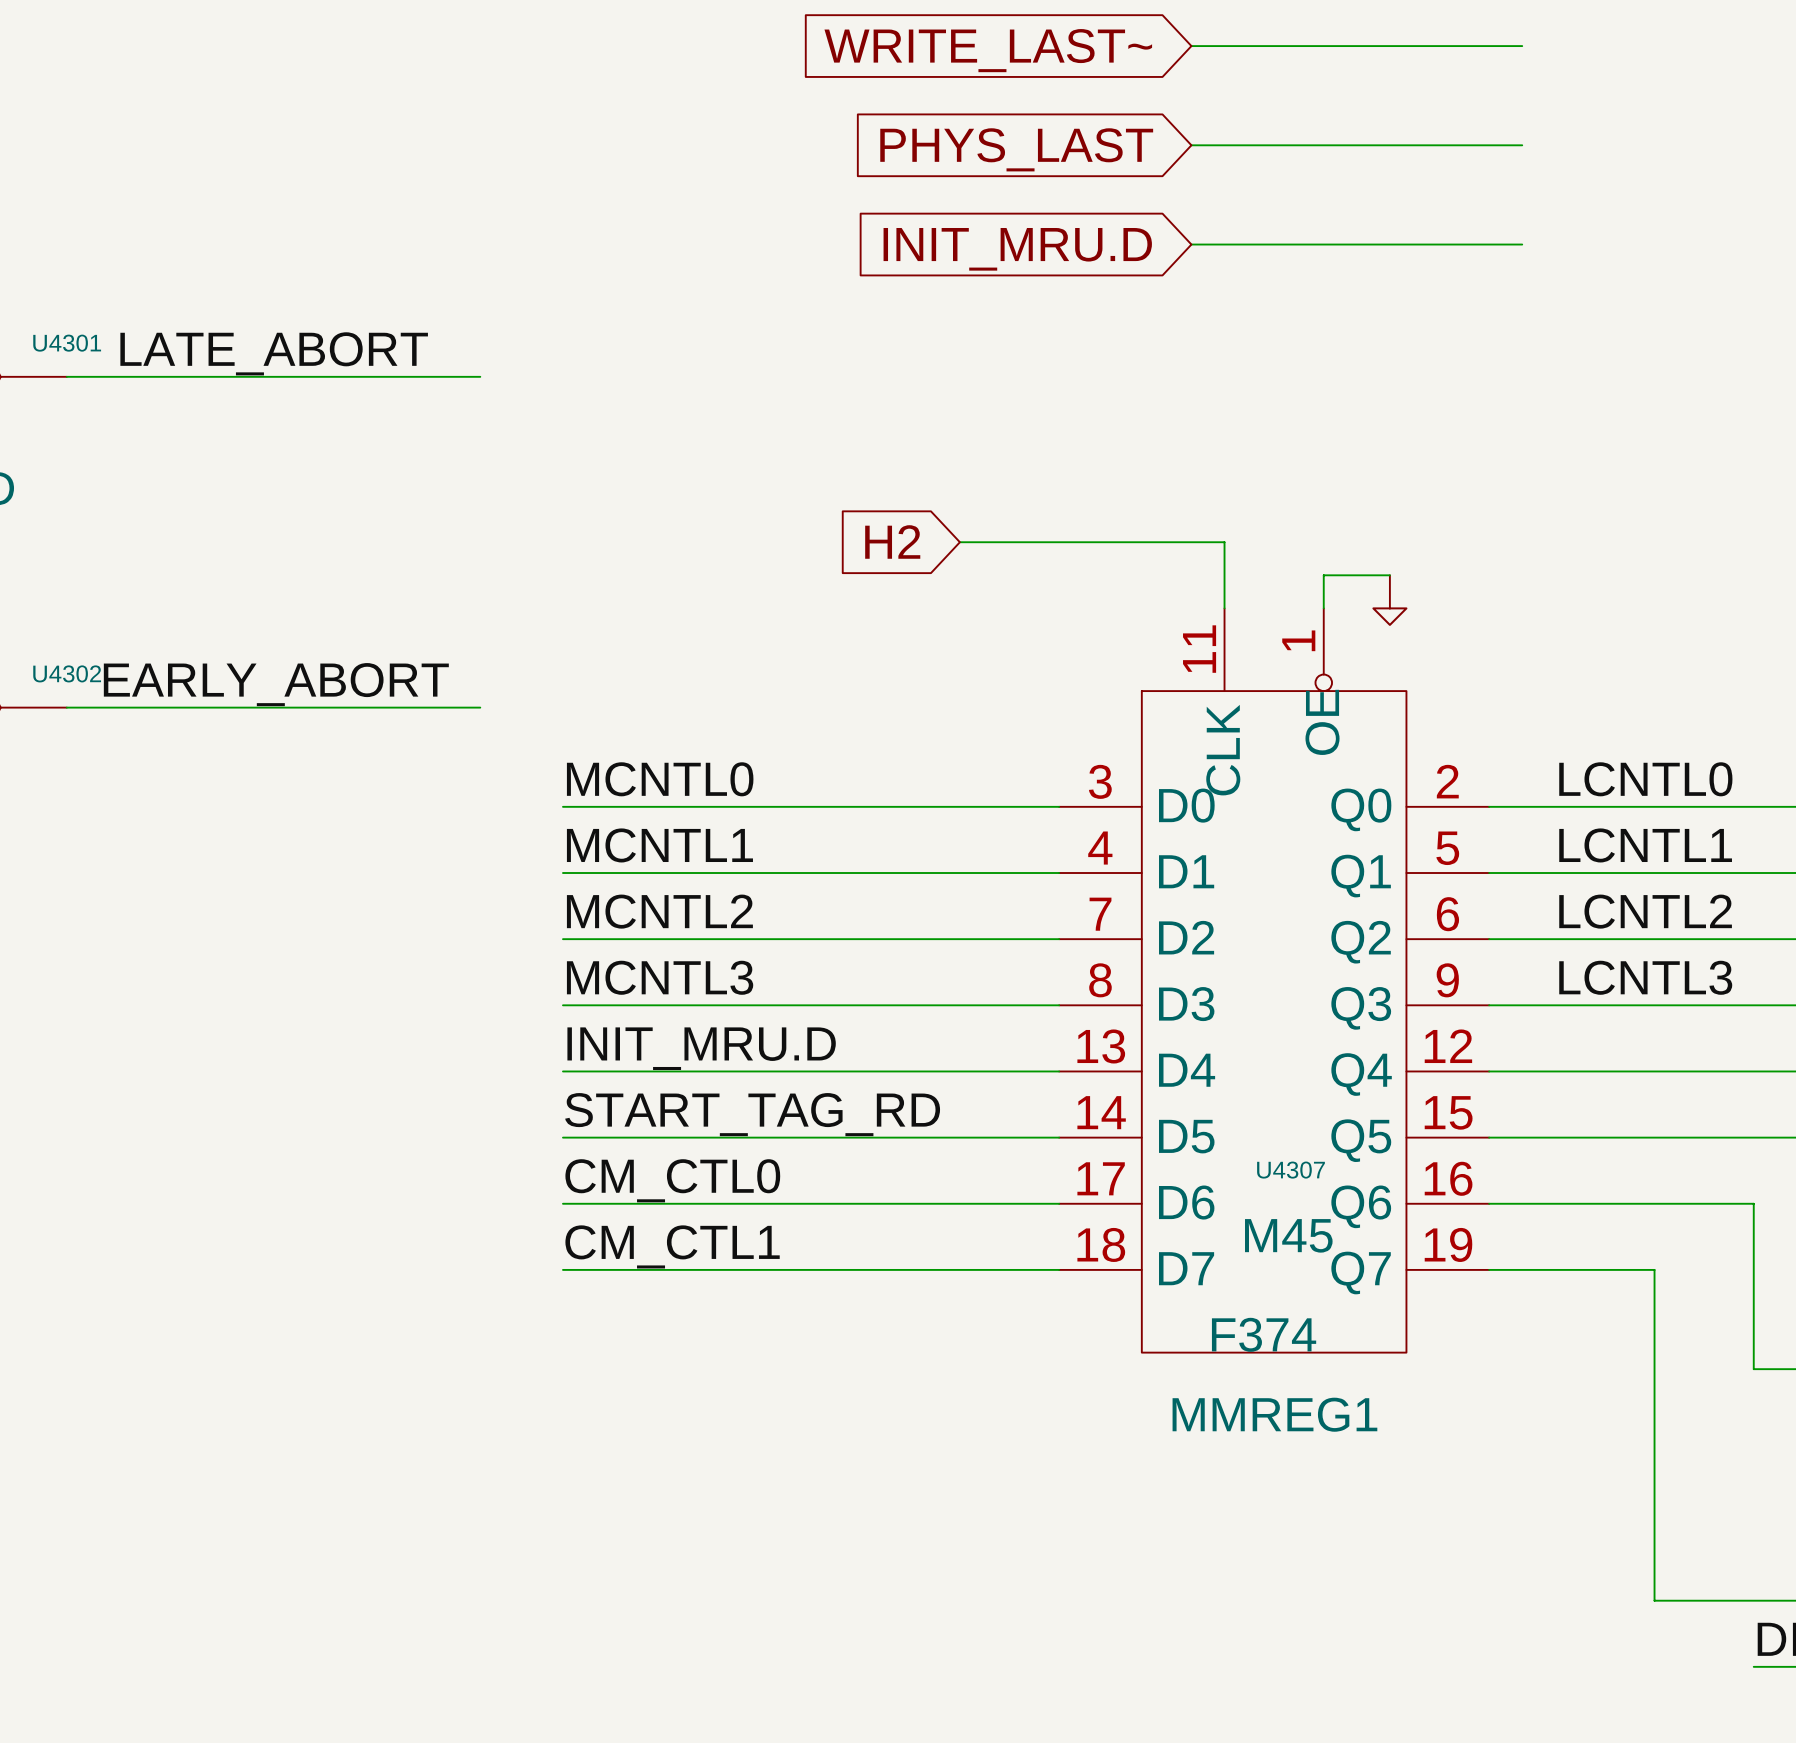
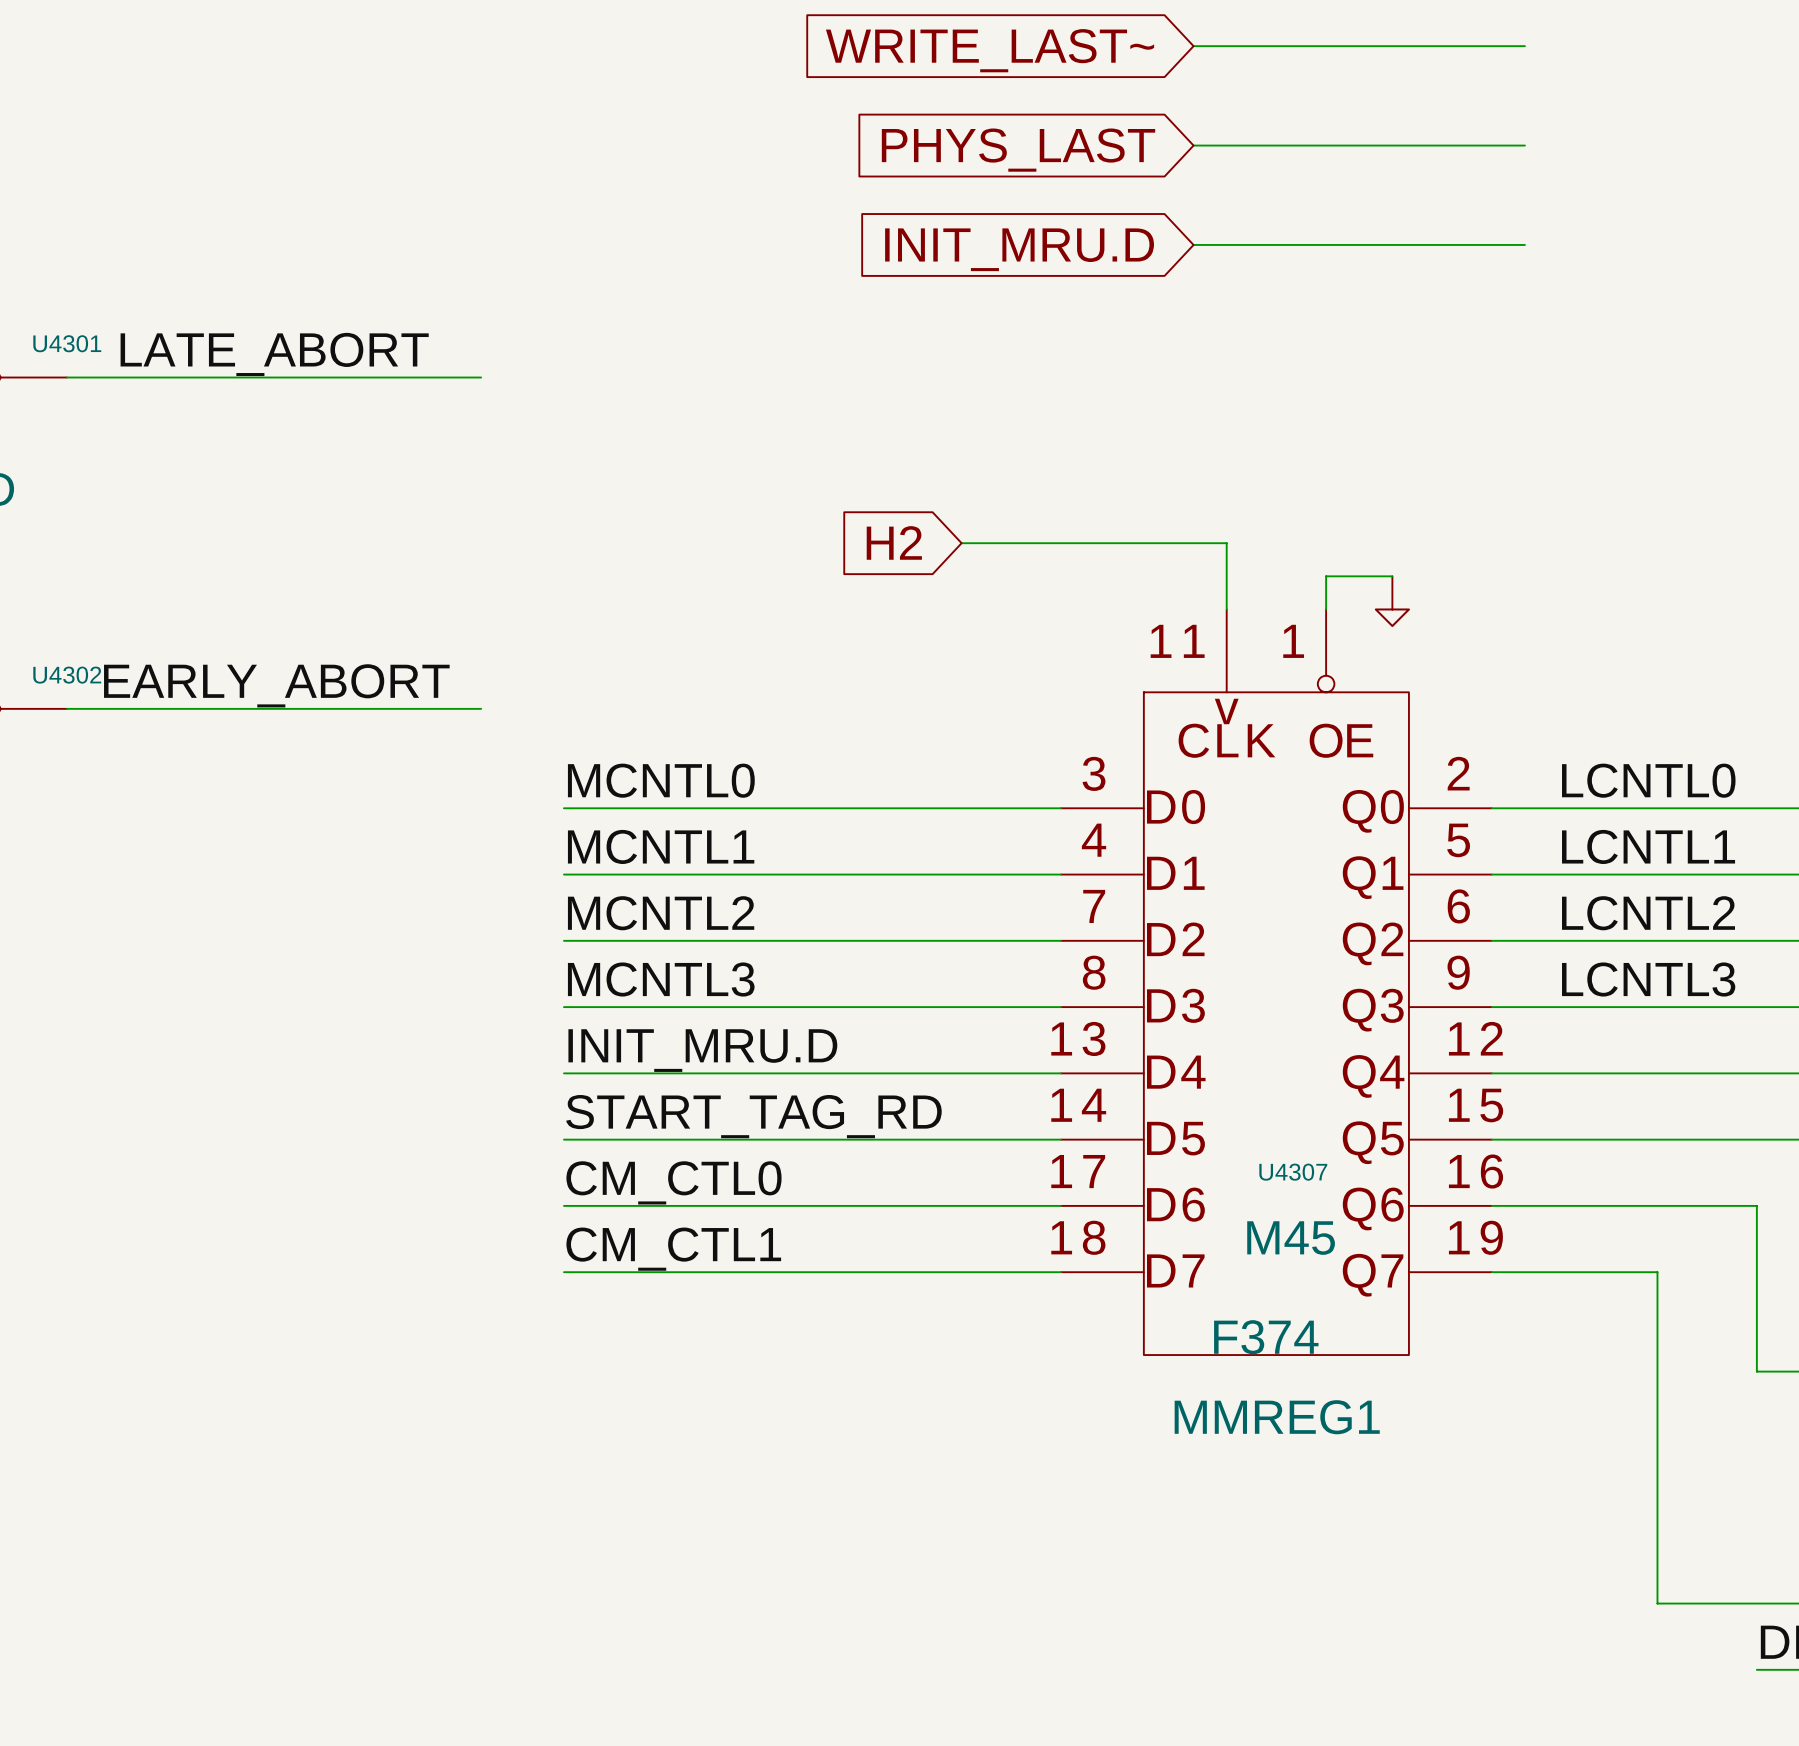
U4307 symbol: [1059, 608, 1490, 1353] -> [1061, 609, 1492, 1356]

